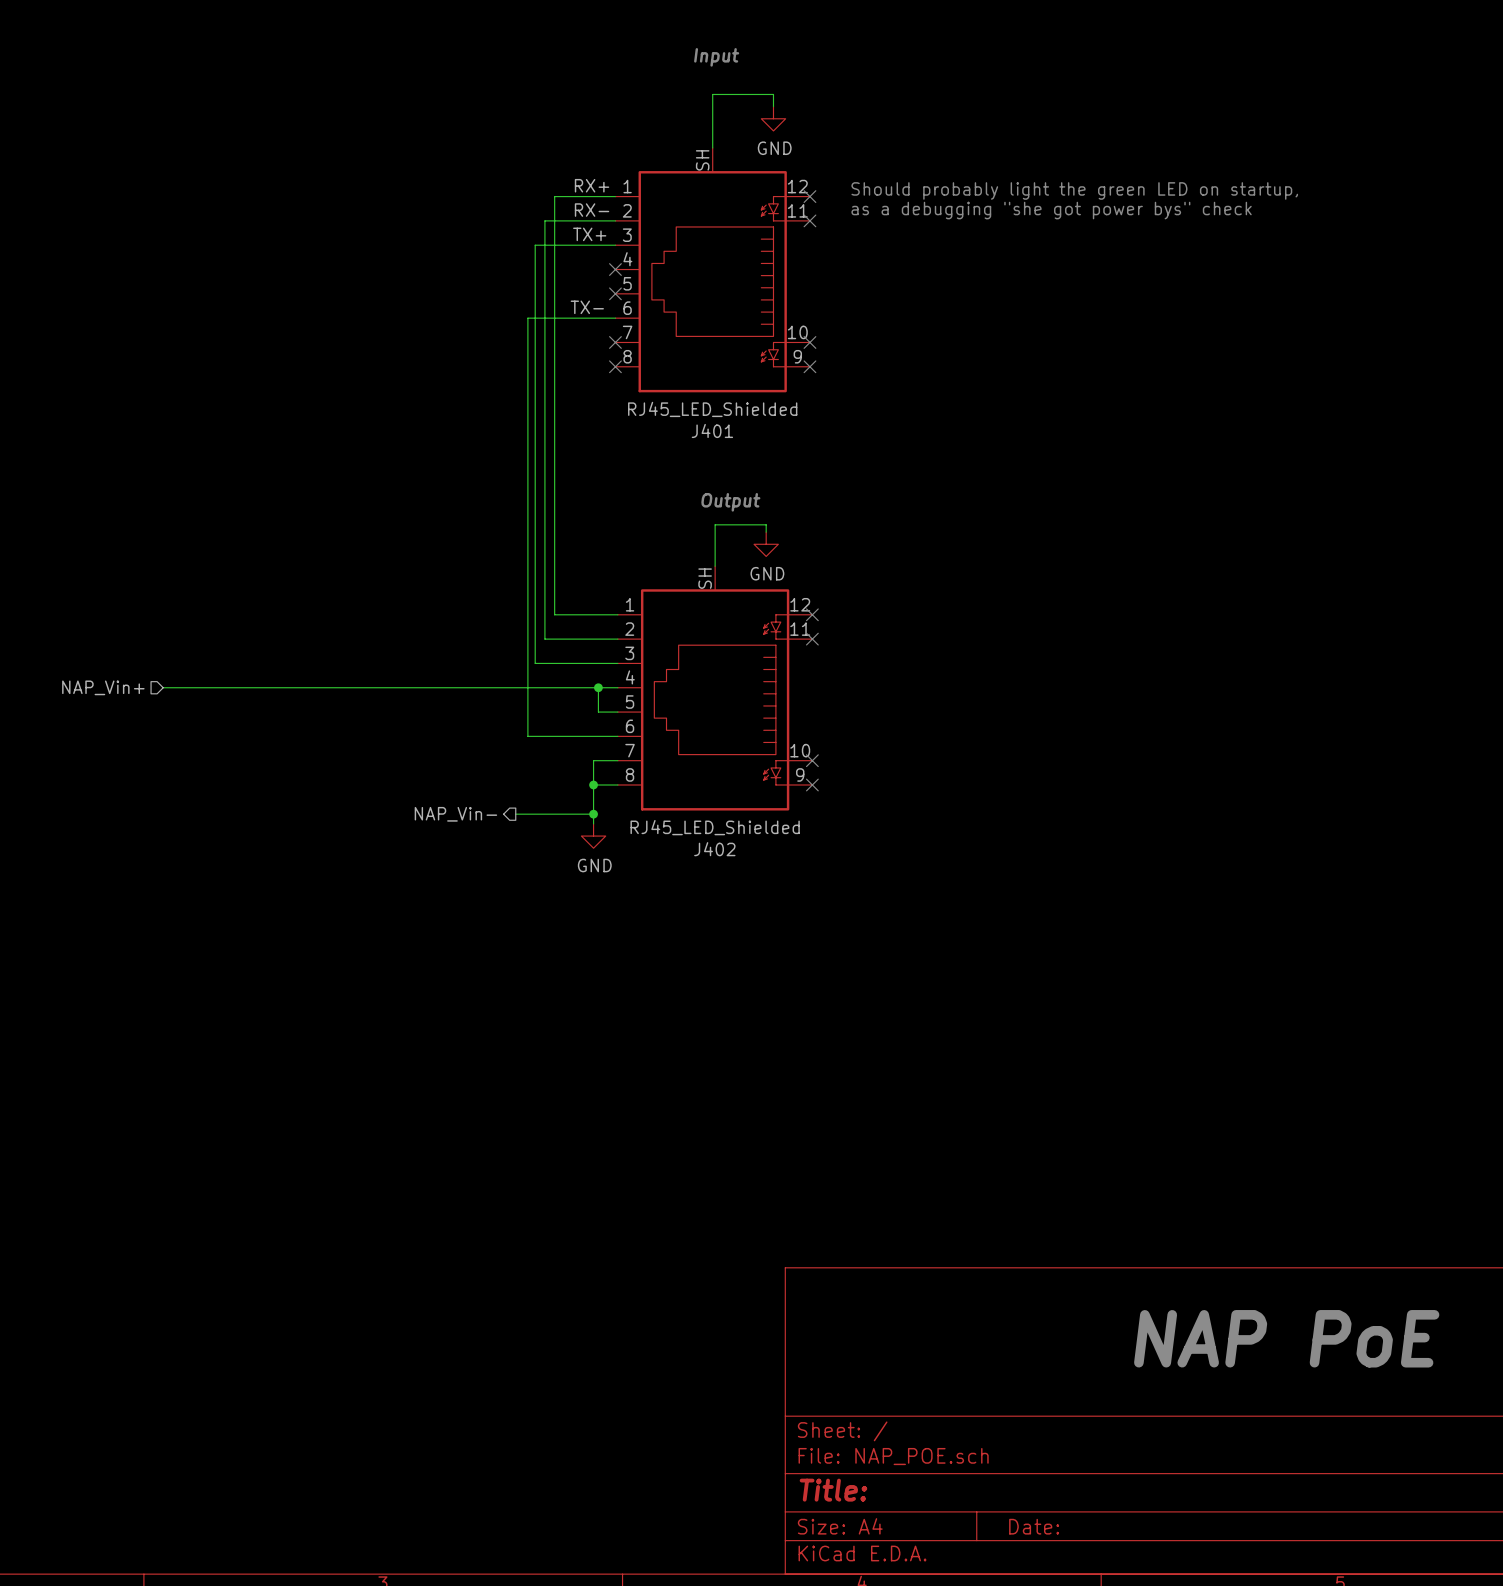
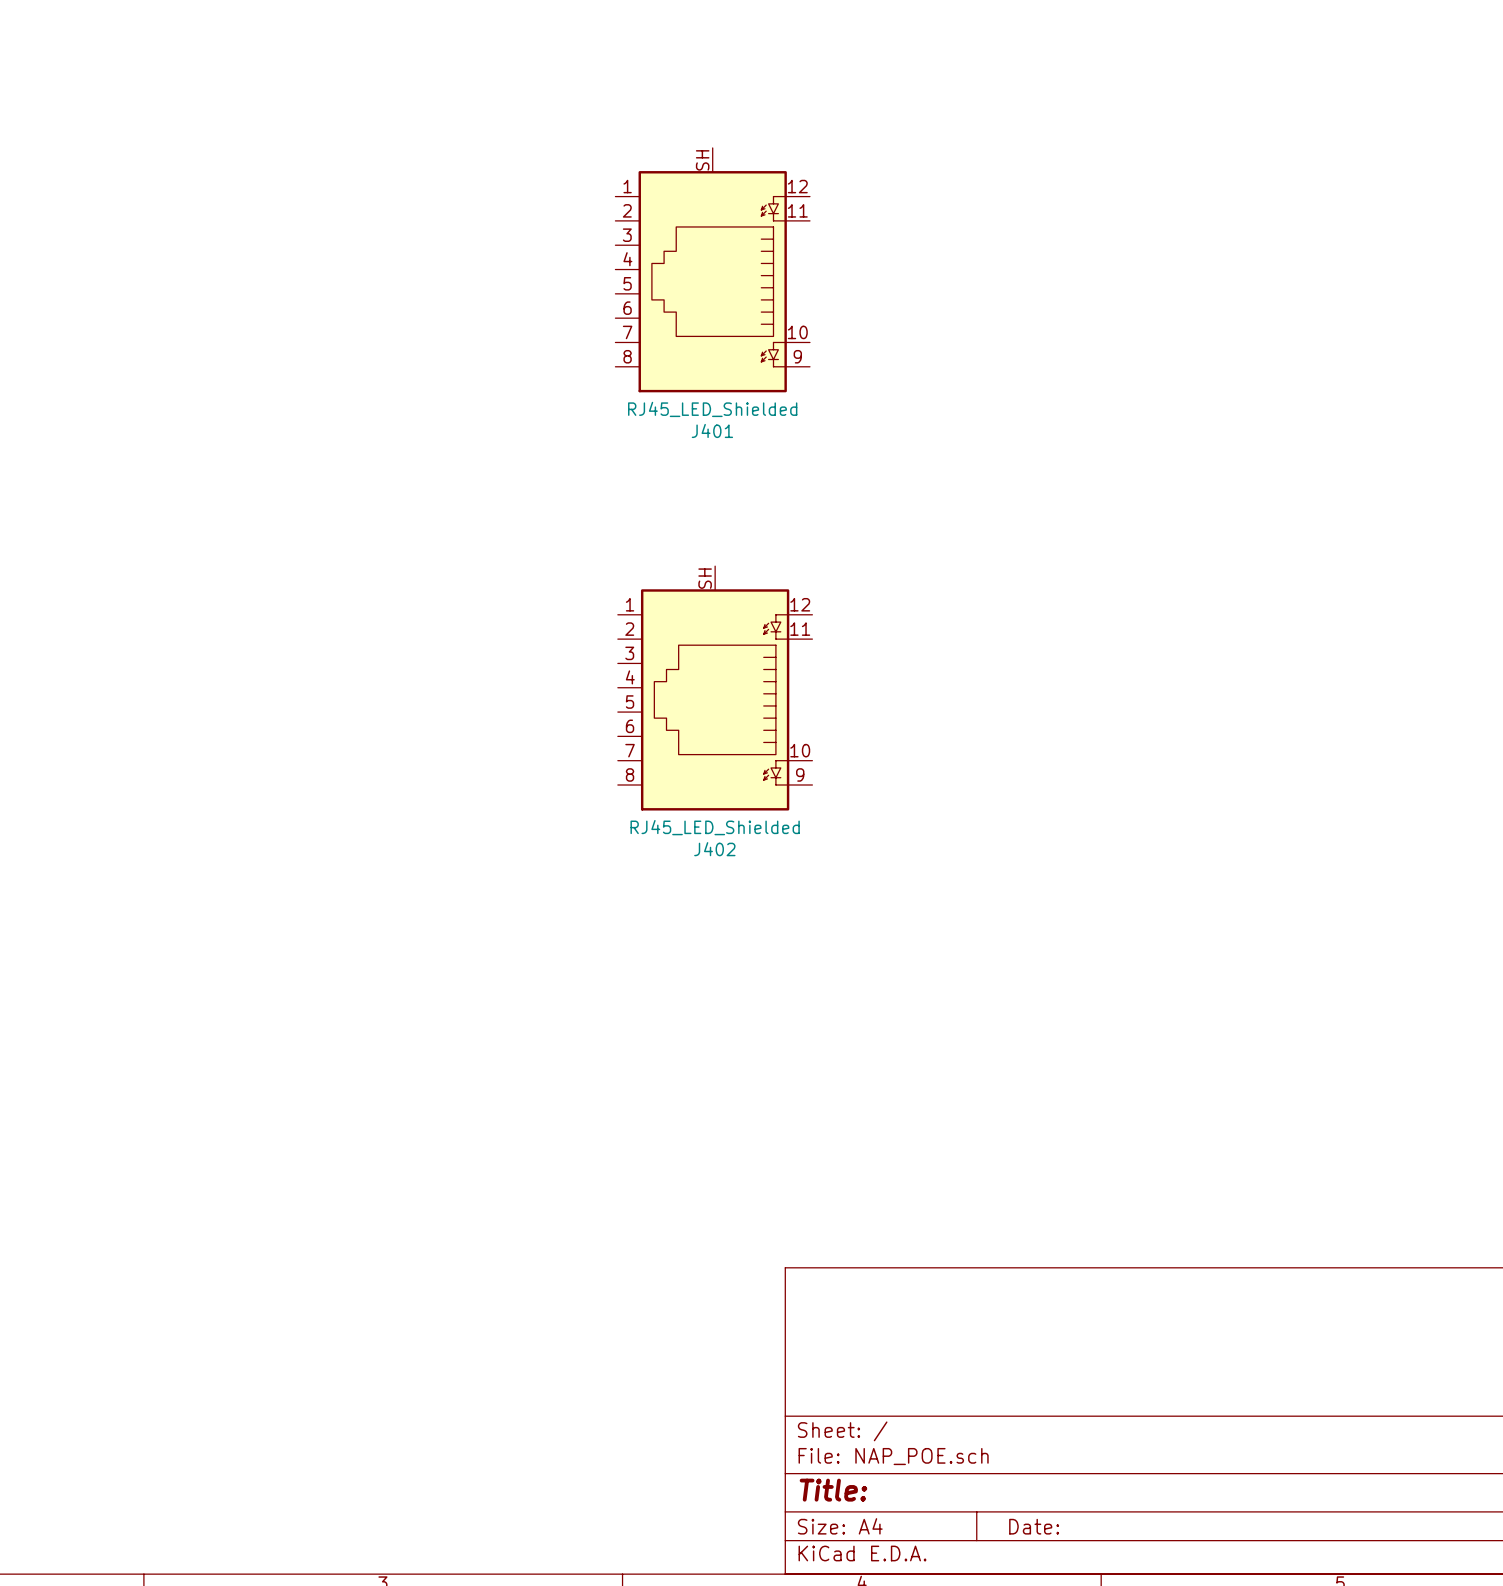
text: Input (716, 57) -> none
wire: (773, 106) (773, 94) (712, 94) (712, 147) -> none
power symbol: GND (773, 118) -> none
label: RX+ (592, 185) -> none
text: Should probably light the green LED on startup, (1074, 190) -> none
wire: (615, 196) (554, 196) (554, 614) (617, 614) -> none
no-connect mark: (809, 196) -> none
label: RX- (592, 210) -> none
text: as a debugging "she got power bys" check (1051, 210) -> none
wire: (615, 220) (544, 220) (544, 639) (617, 639) -> none
no-connect mark: (809, 220) -> none
label: TX+ (589, 234) -> none
wire: (615, 245) (535, 245) (535, 663) (617, 663) -> none
no-connect mark: (615, 269) -> none
no-connect mark: (615, 293) -> none
label: TX- (587, 307) -> none
wire: (615, 318) (527, 318) (527, 736) (617, 736) -> none
no-connect mark: (615, 342) -> none
no-connect mark: (809, 342) -> none
no-connect mark: (615, 366) -> none
no-connect mark: (809, 366) -> none
text: Output (730, 502) -> none
wire: (766, 532) (766, 524) (715, 524) (715, 566) -> none
power symbol: GND (766, 544) -> none
no-connect mark: (812, 614) -> none
no-connect mark: (812, 639) -> none
hierarchical label: NAP_Vin+ (103, 687) -> none
wire: (163, 687) (617, 687) -> none
wire: (598, 687) (598, 712) (617, 712) -> none
junction: (598, 687) -> none
wire: (617, 760) (593, 760) (593, 823) -> none
no-connect mark: (812, 760) -> none
wire: (593, 785) (617, 785) -> none
junction: (593, 785) -> none
no-connect mark: (812, 785) -> none
hierarchical label: NAP_Vin- (455, 814) -> none
wire: (515, 814) (593, 814) -> none
junction: (593, 814) -> none
power symbol: GND (593, 836) -> none
text: NAP PoE (1286, 1338) -> none

